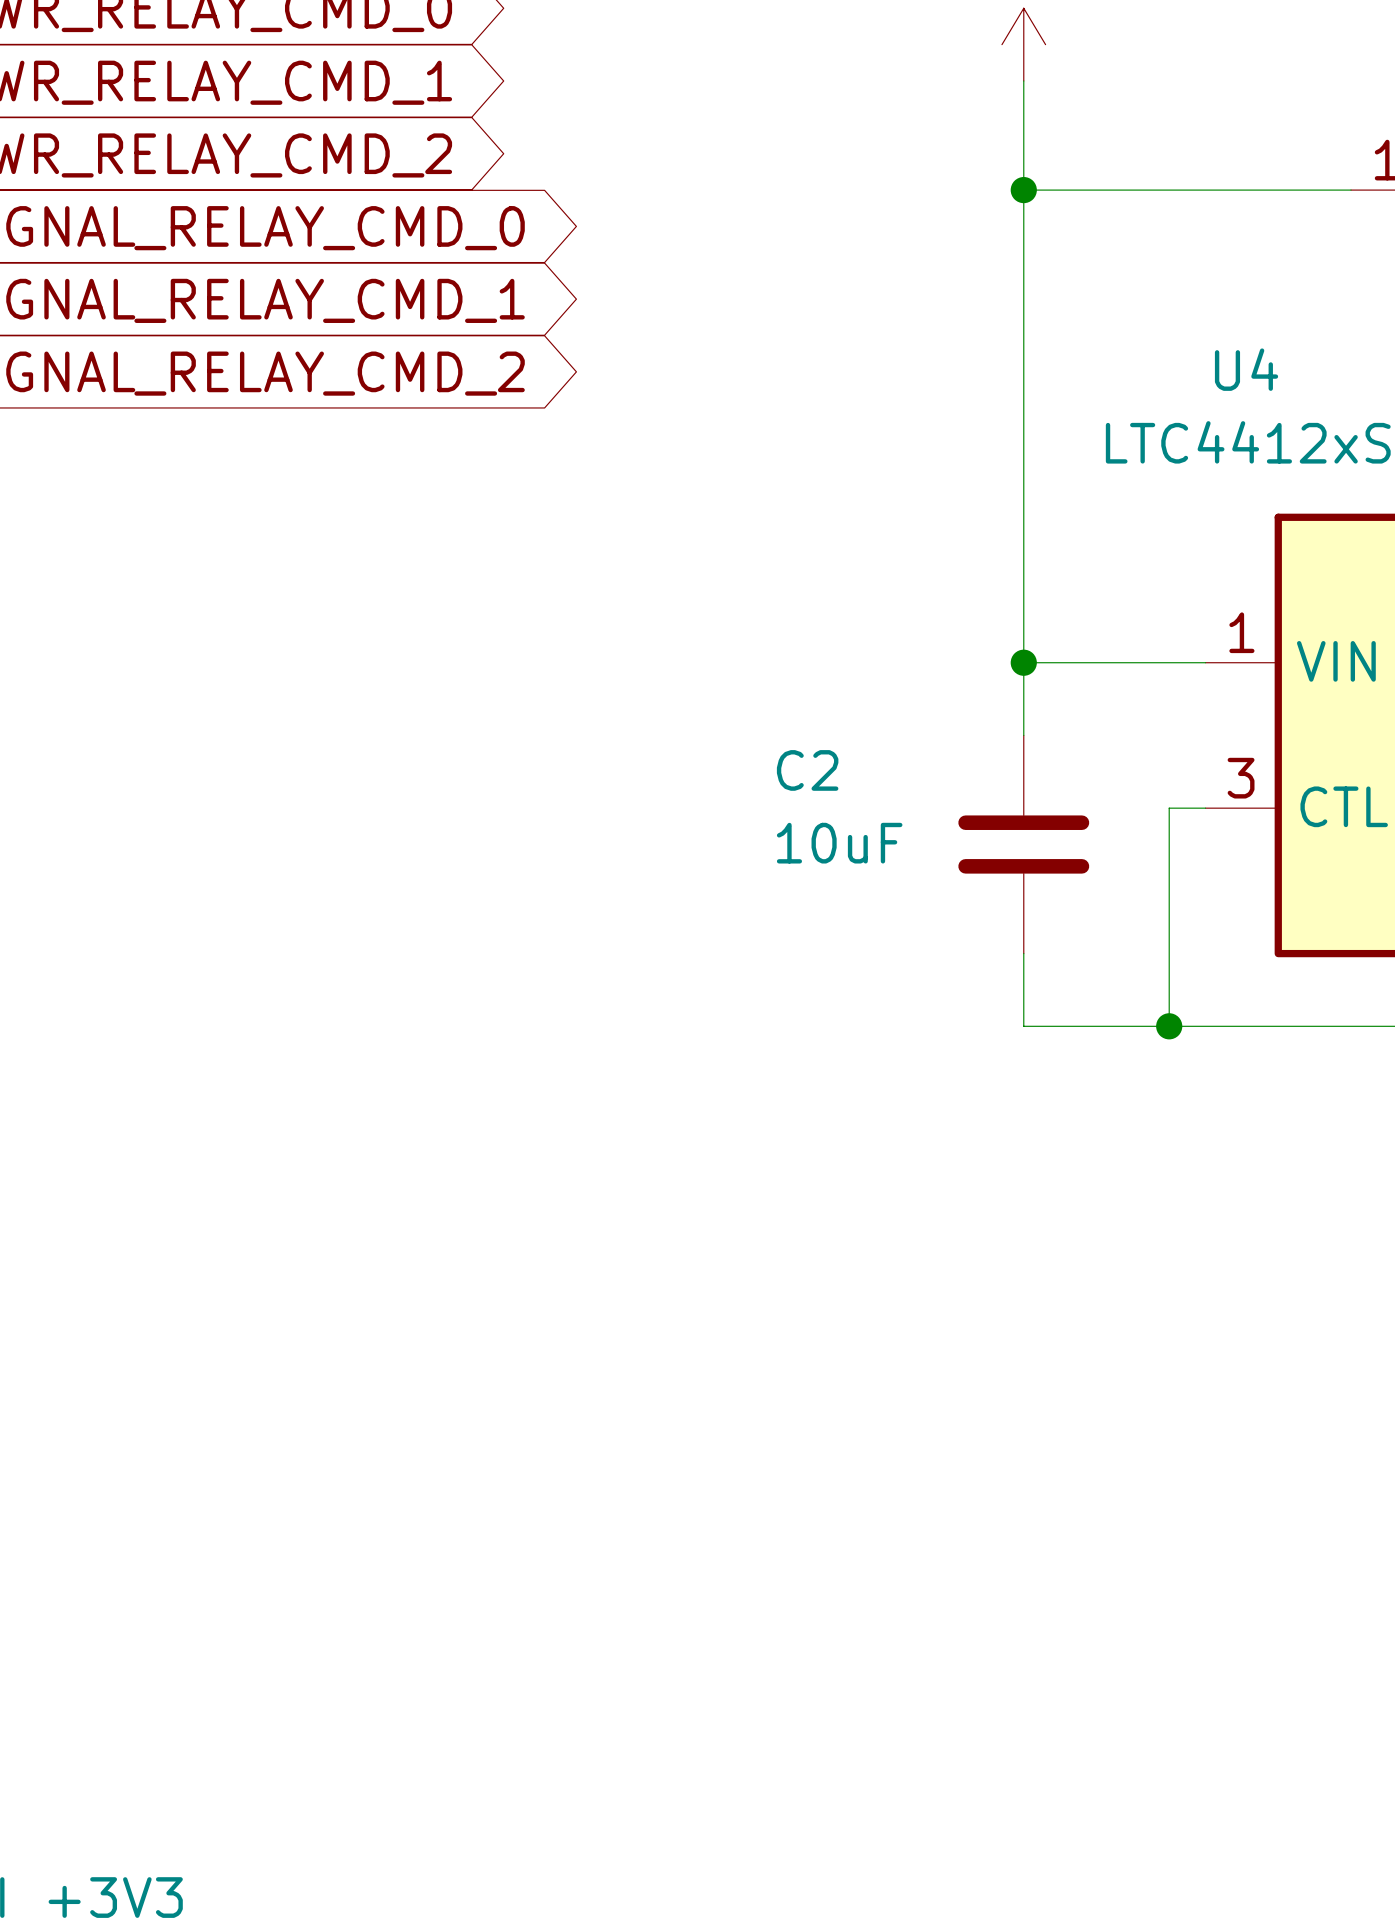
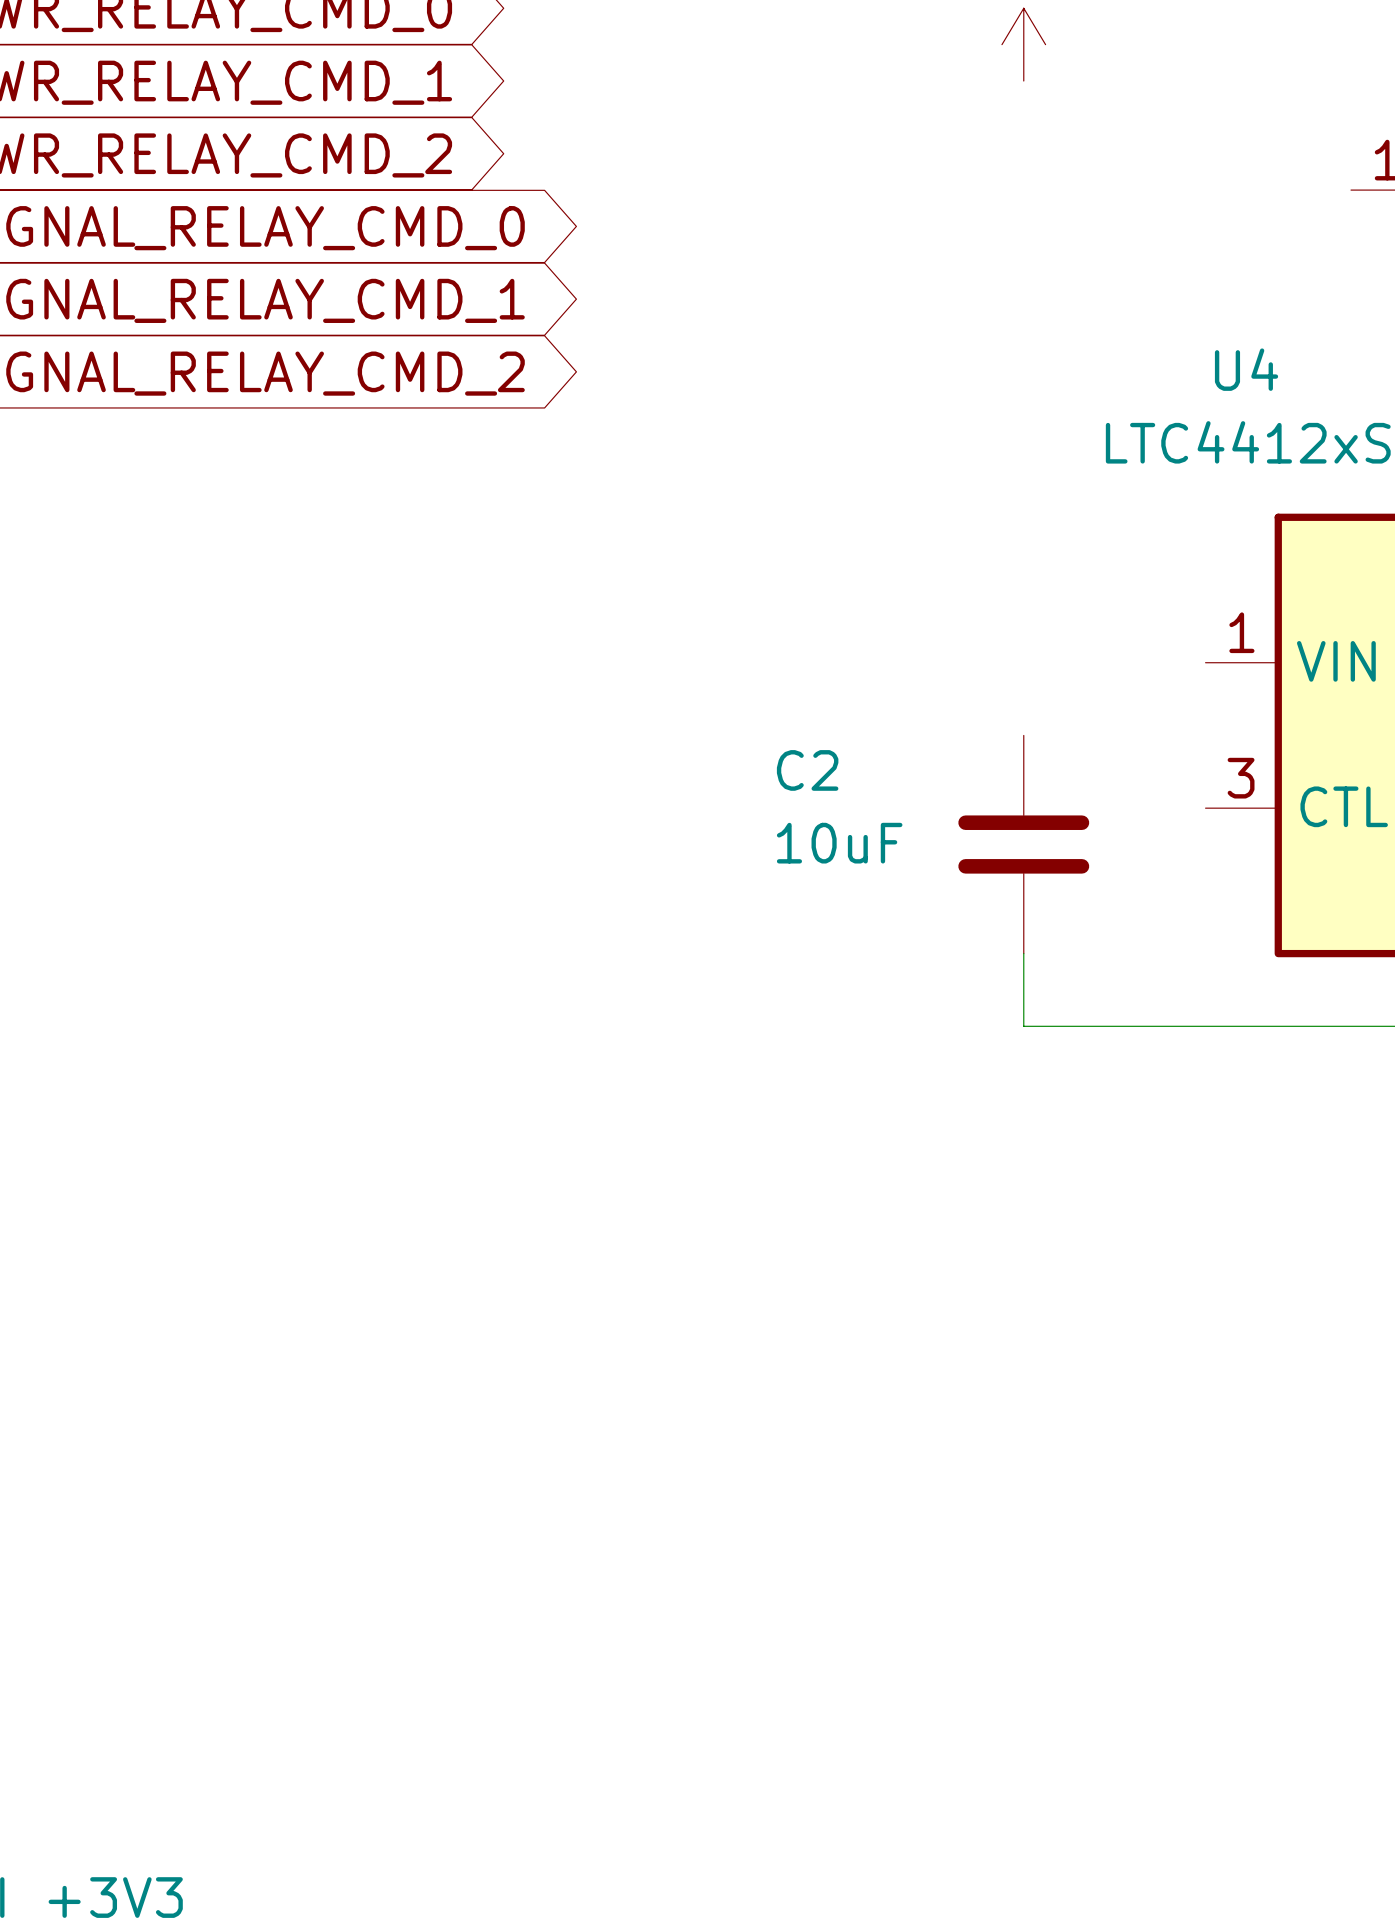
wire: (1023, 81) (1023, 735) -> none
wire: (1023, 190) (1351, 190) -> none
junction: (1023, 190) -> none
wire: (1023, 662) (1205, 662) -> none
junction: (1023, 662) -> none
wire: (1205, 808) (1169, 808) (1169, 1026) -> none
junction: (1169, 1026) -> none

